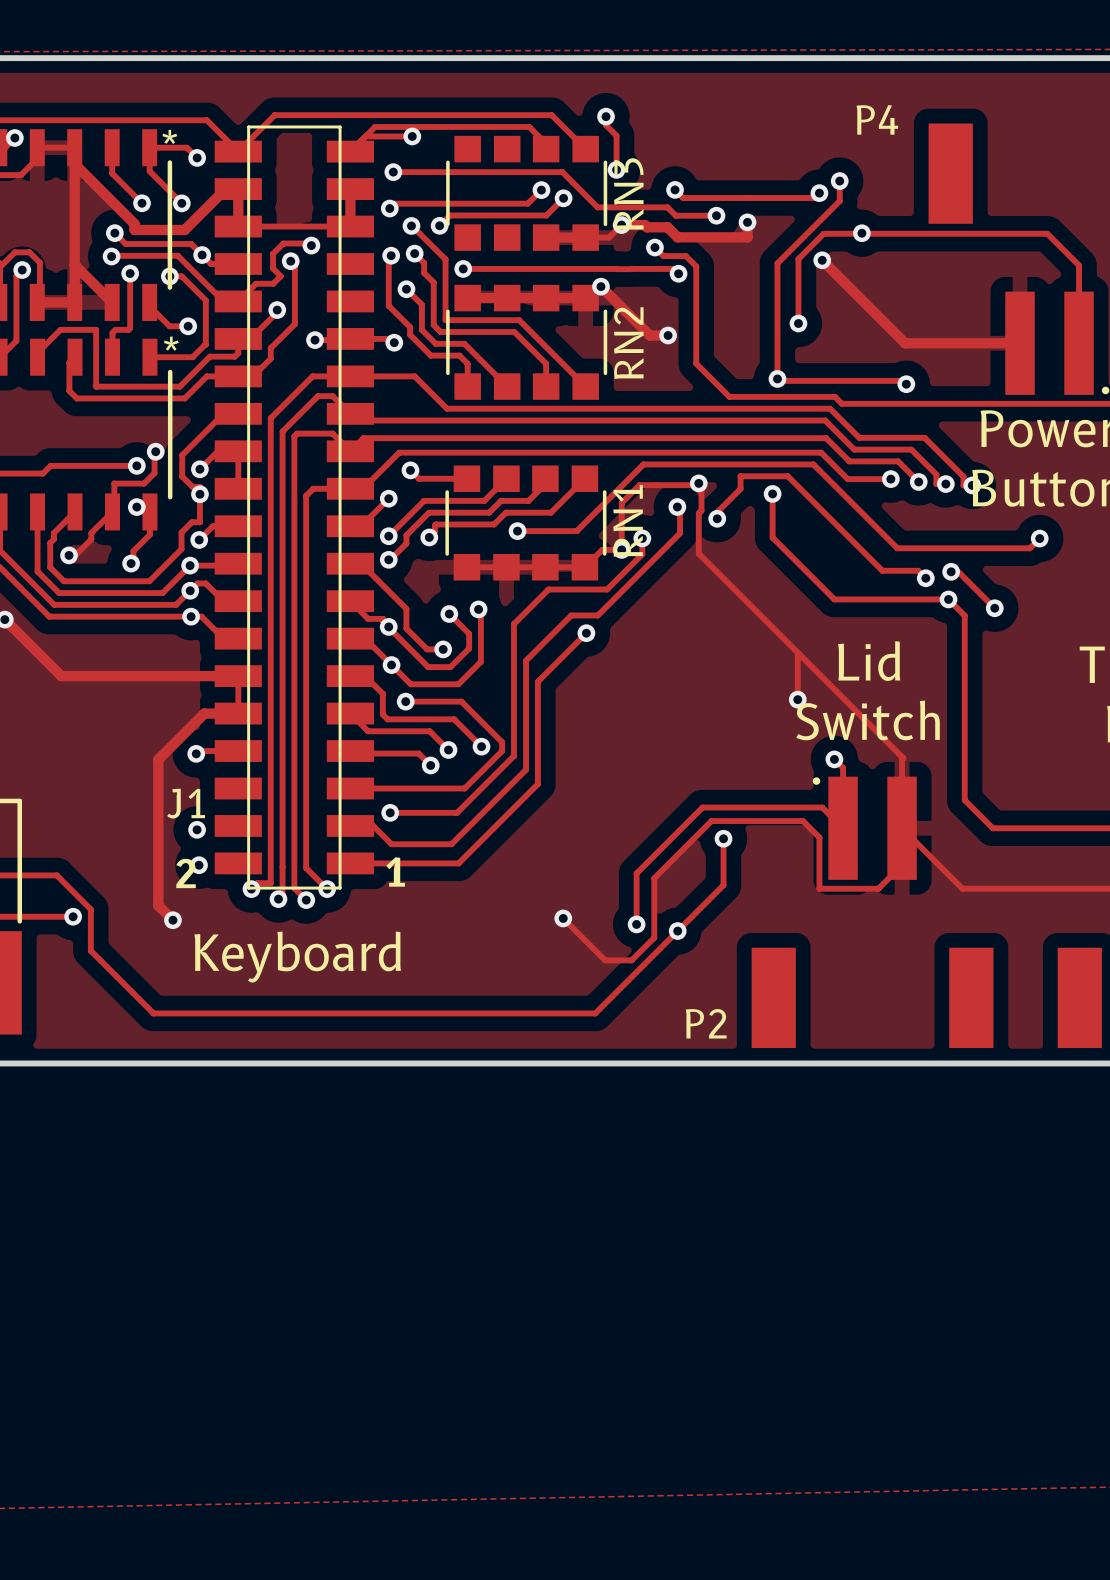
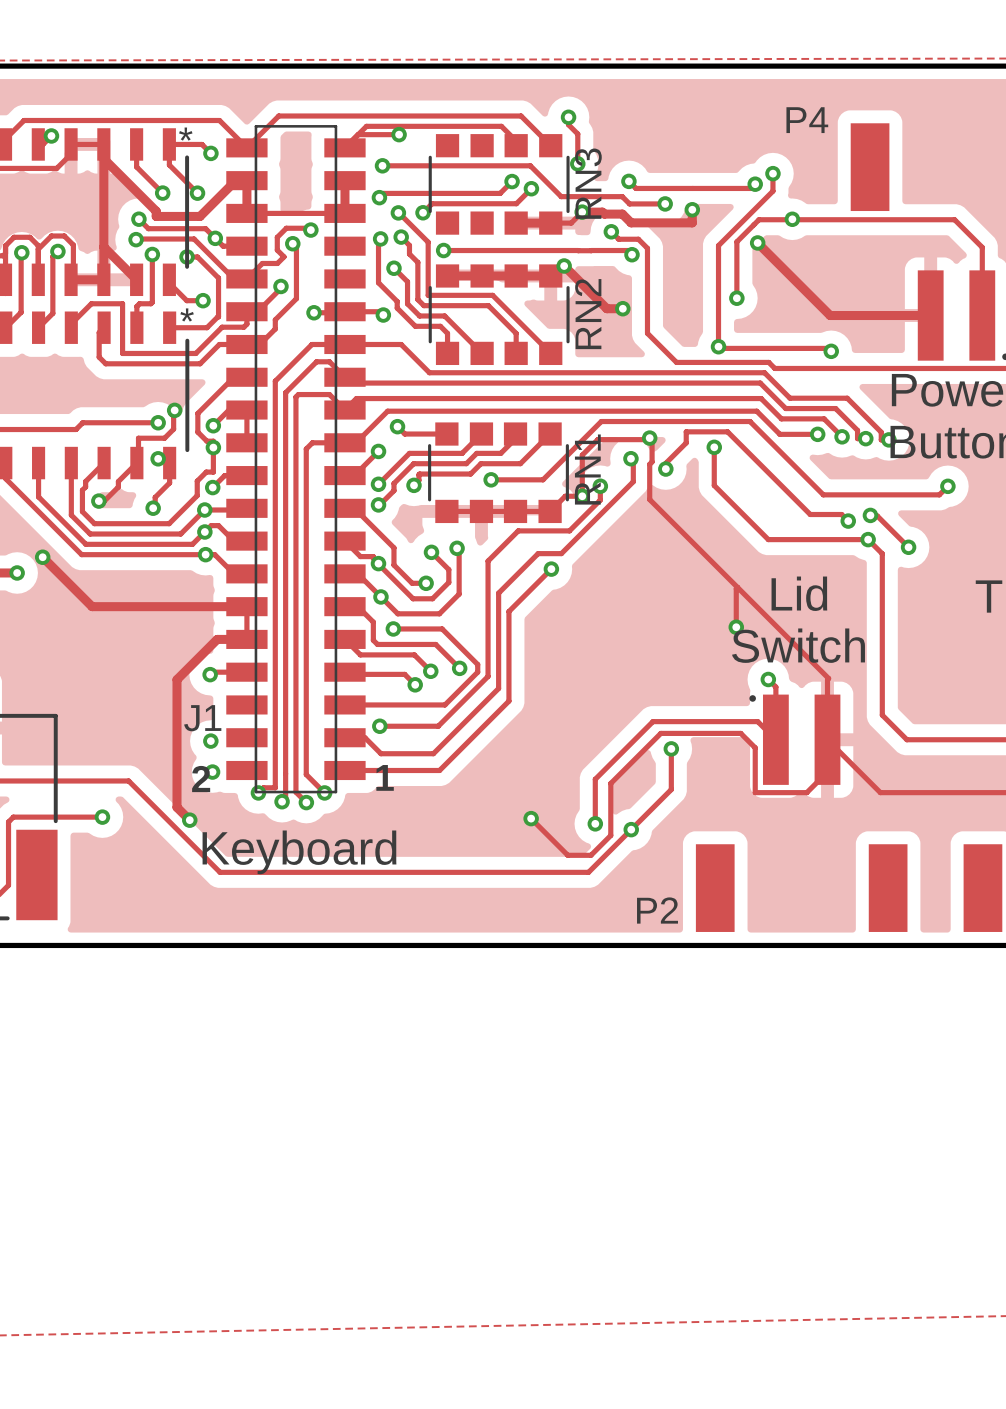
track: (56, 875) (90, 909) (90, 950) (153, 1013) (595, 1013) (628, 979) -> (88, 780) (128, 780) (220, 872) (588, 872)

